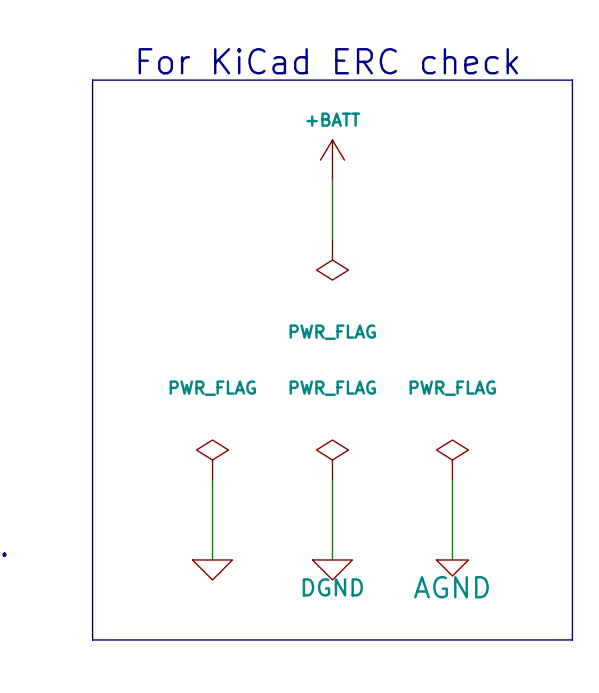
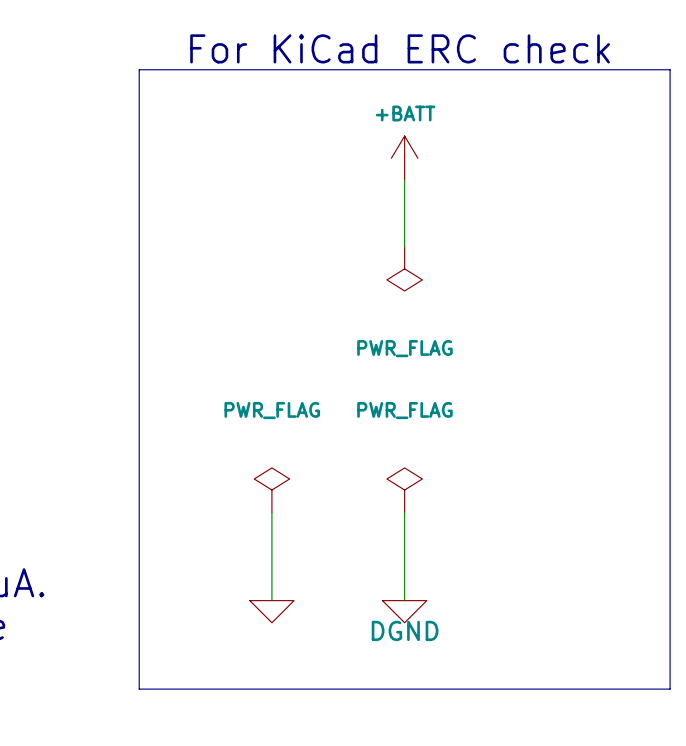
power symbol: PWR_FLAG (452, 460) -> none
wire: (452, 480) (452, 559) -> none
power symbol: AGND (452, 567) -> none

